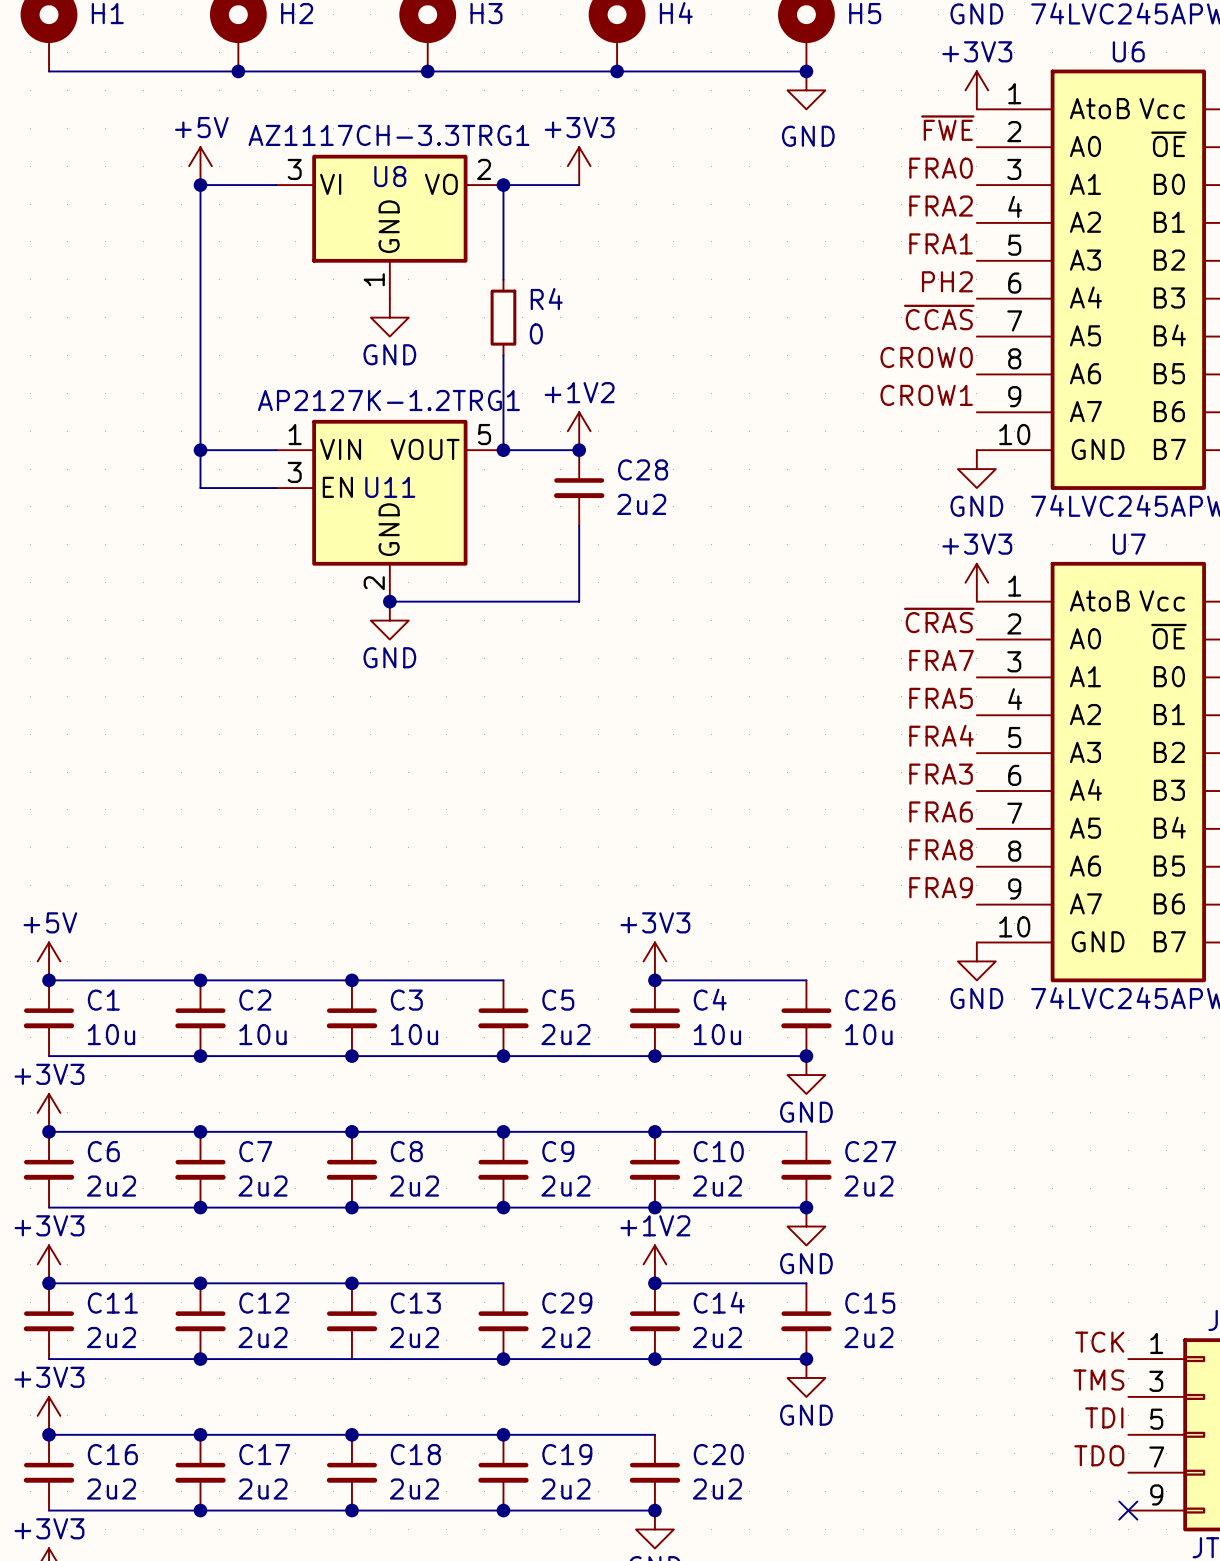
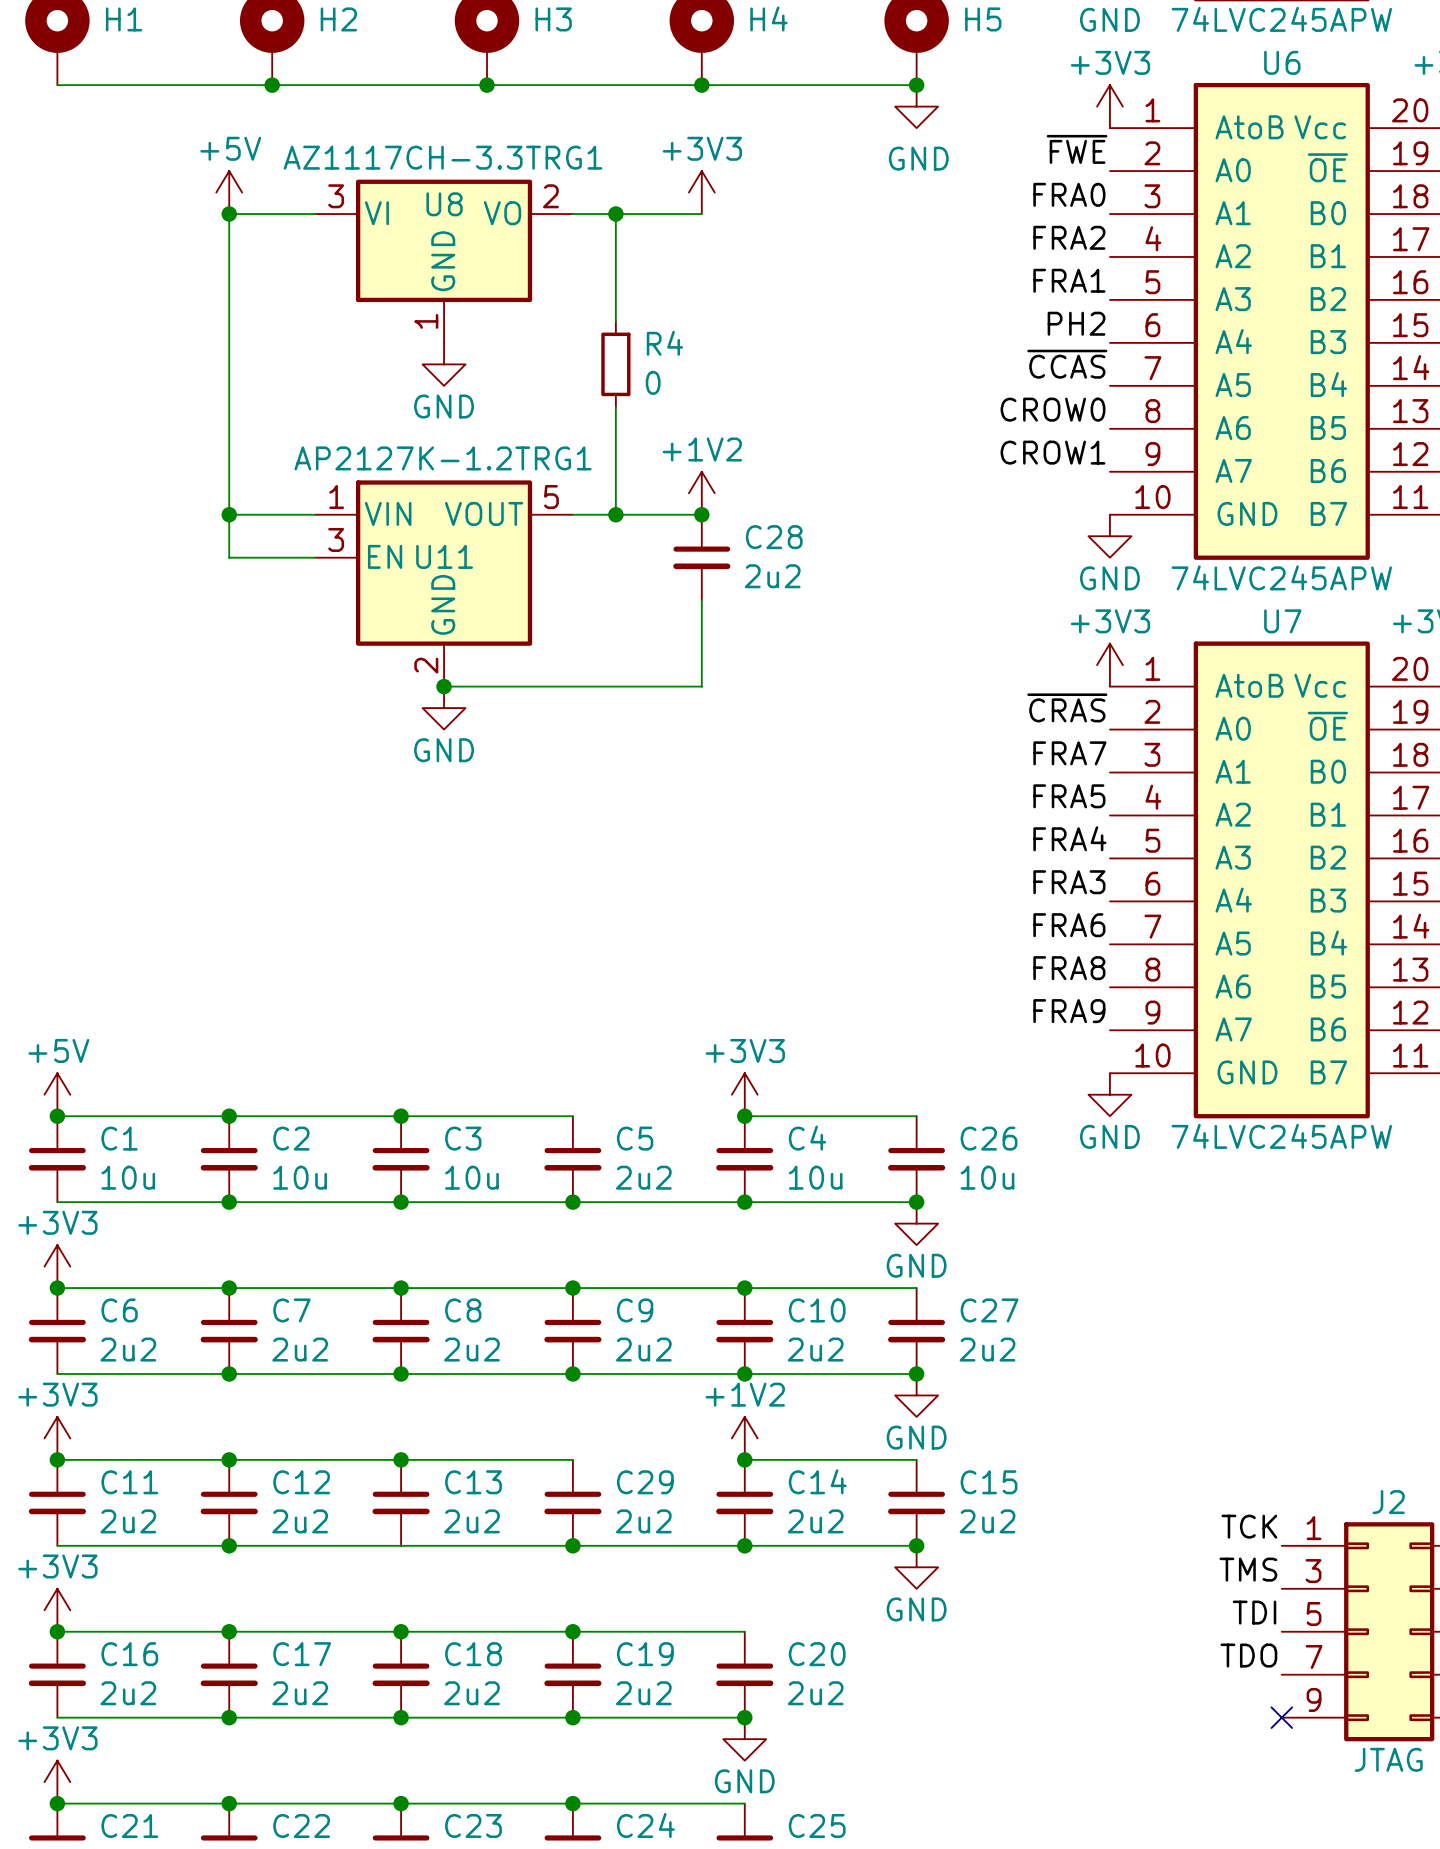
power symbol position: +3V3 (579, 166) -> +3V3 (701, 192)
wire: (503, 185) (503, 279) -> (615, 214) (615, 321)
junction position: (503, 185) -> (615, 214)
wire: none -> (658, 214) (701, 214)
R4 position: (503, 317) -> (615, 364)
wire: (503, 355) (503, 450) -> (615, 407) (615, 514)
power symbol position: +1V2 (579, 431) -> +1V2 (701, 493)
junction: (503, 450) -> none
junction: none -> (615, 514)
wire: none -> (658, 514) (701, 514)
junction: (579, 450) -> none
junction: none -> (701, 514)
C28 position: (579, 488) -> (701, 557)
wire: (579, 525) (579, 601) -> (701, 600) (701, 686) (658, 686)

